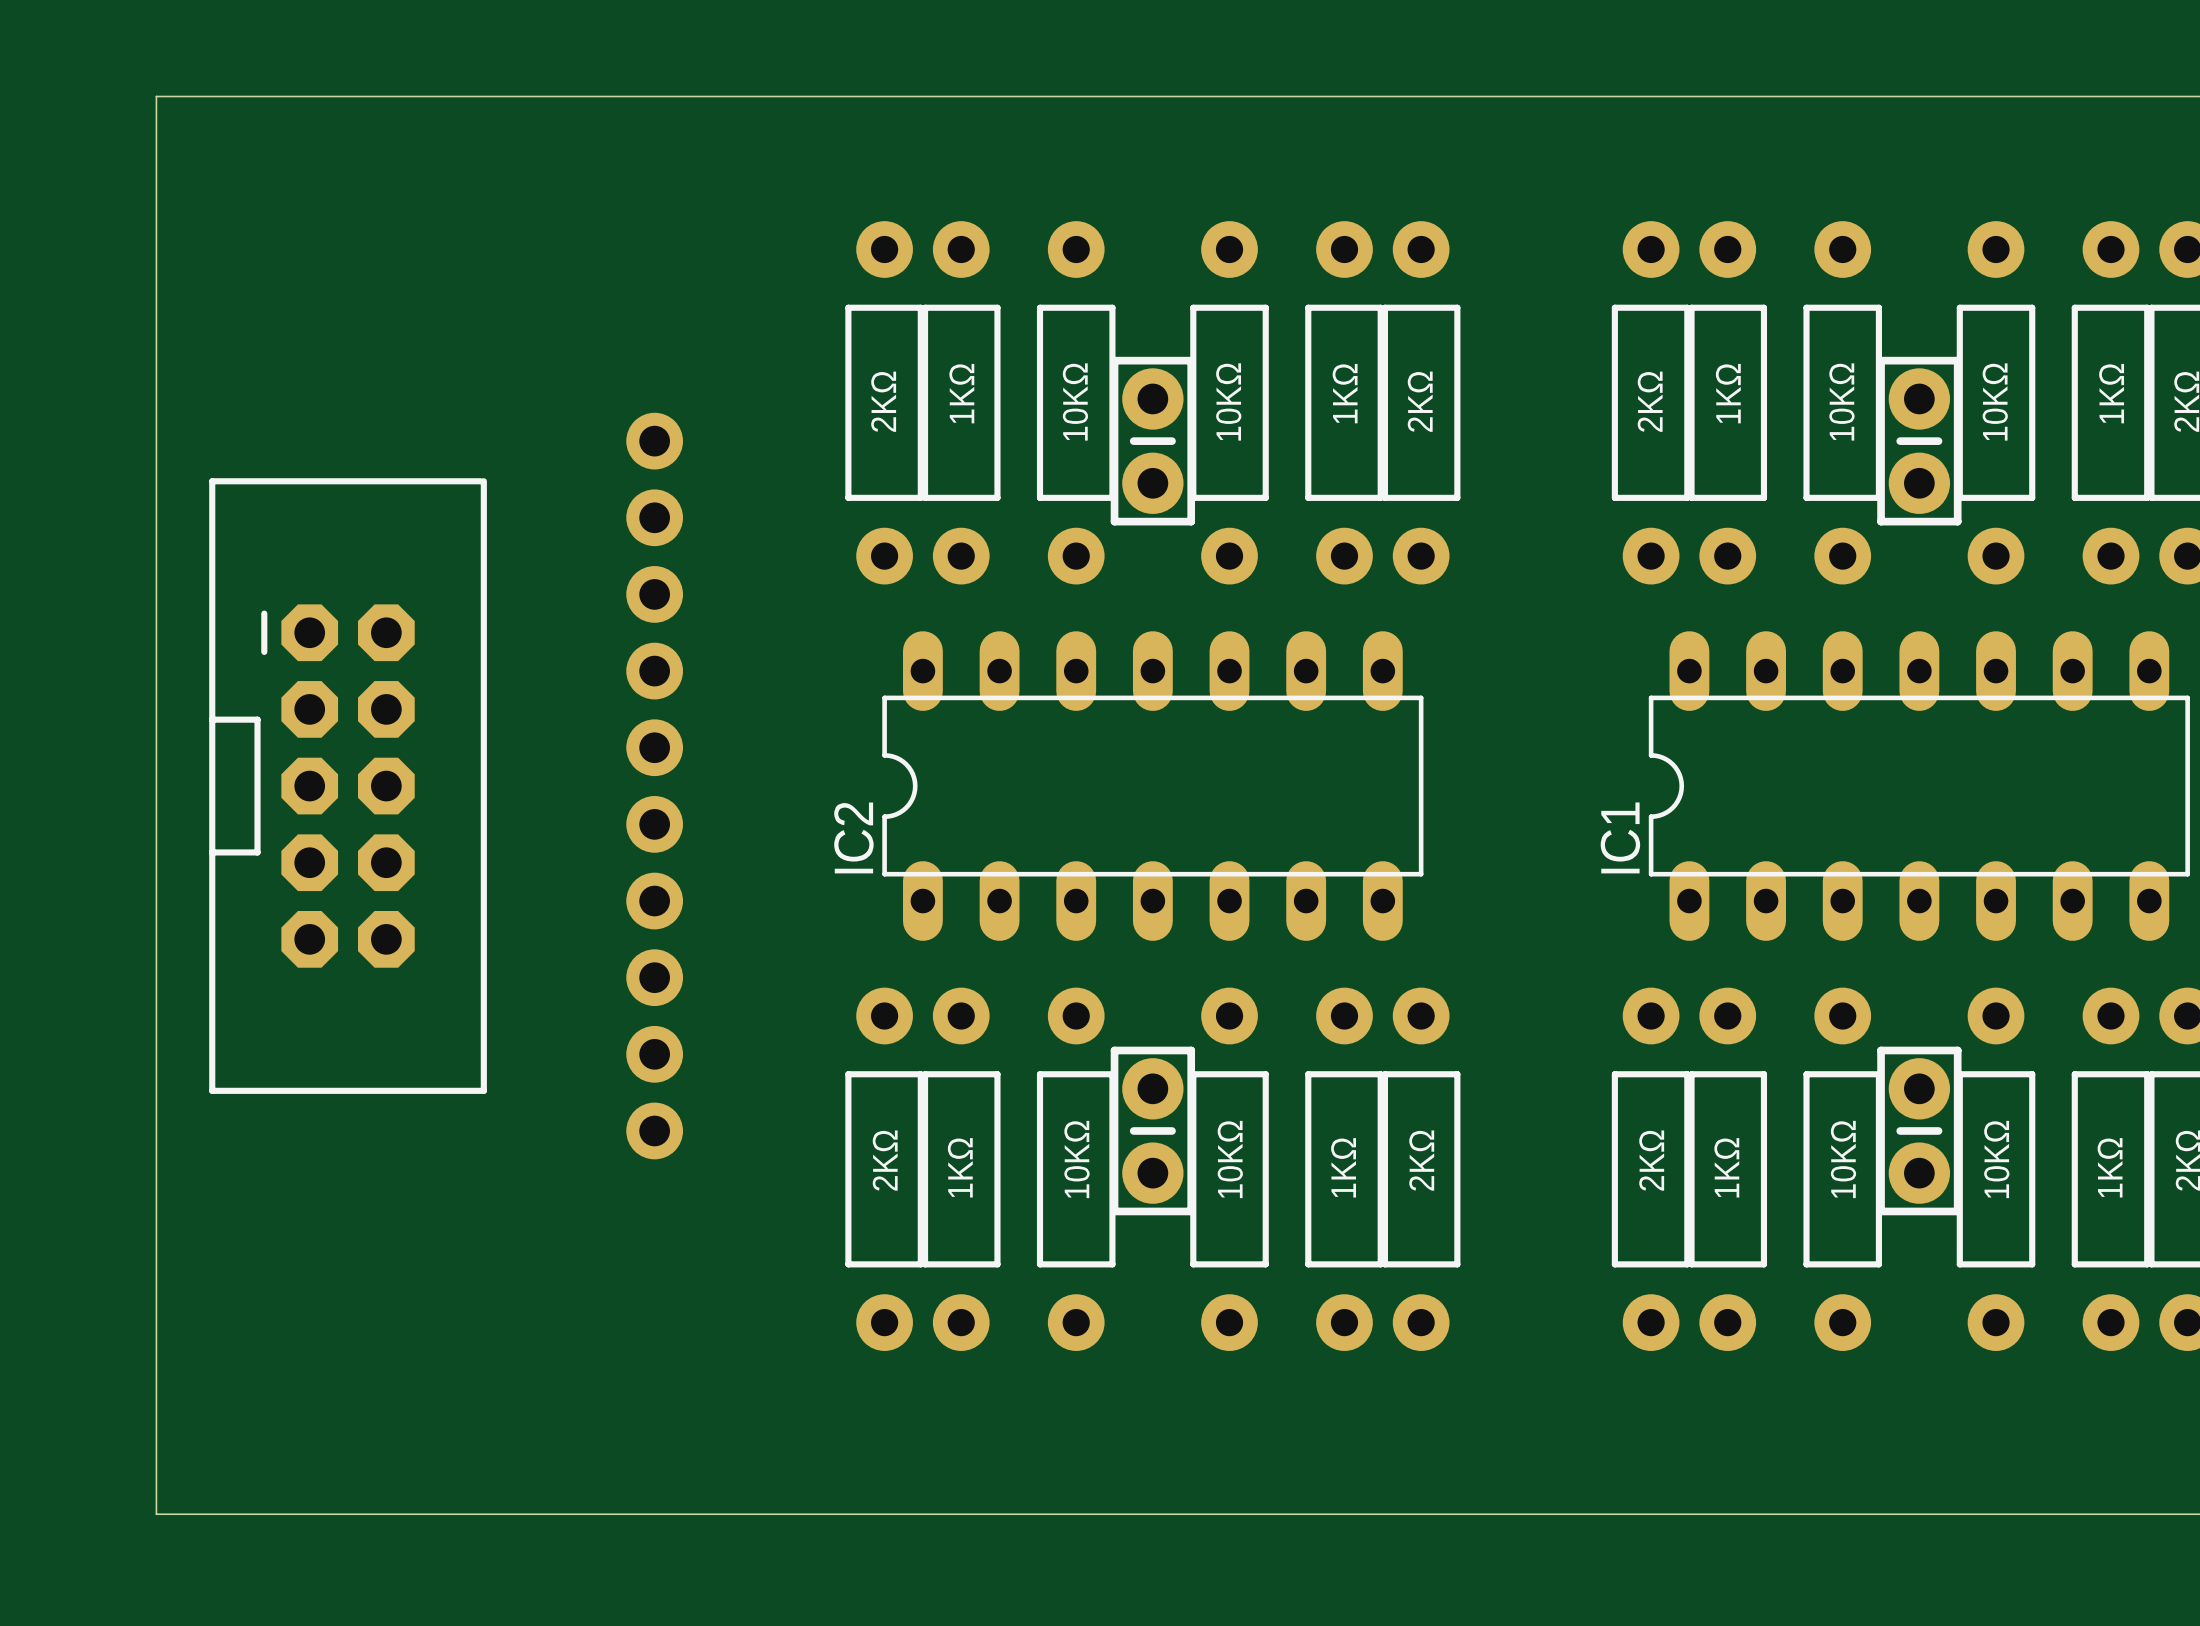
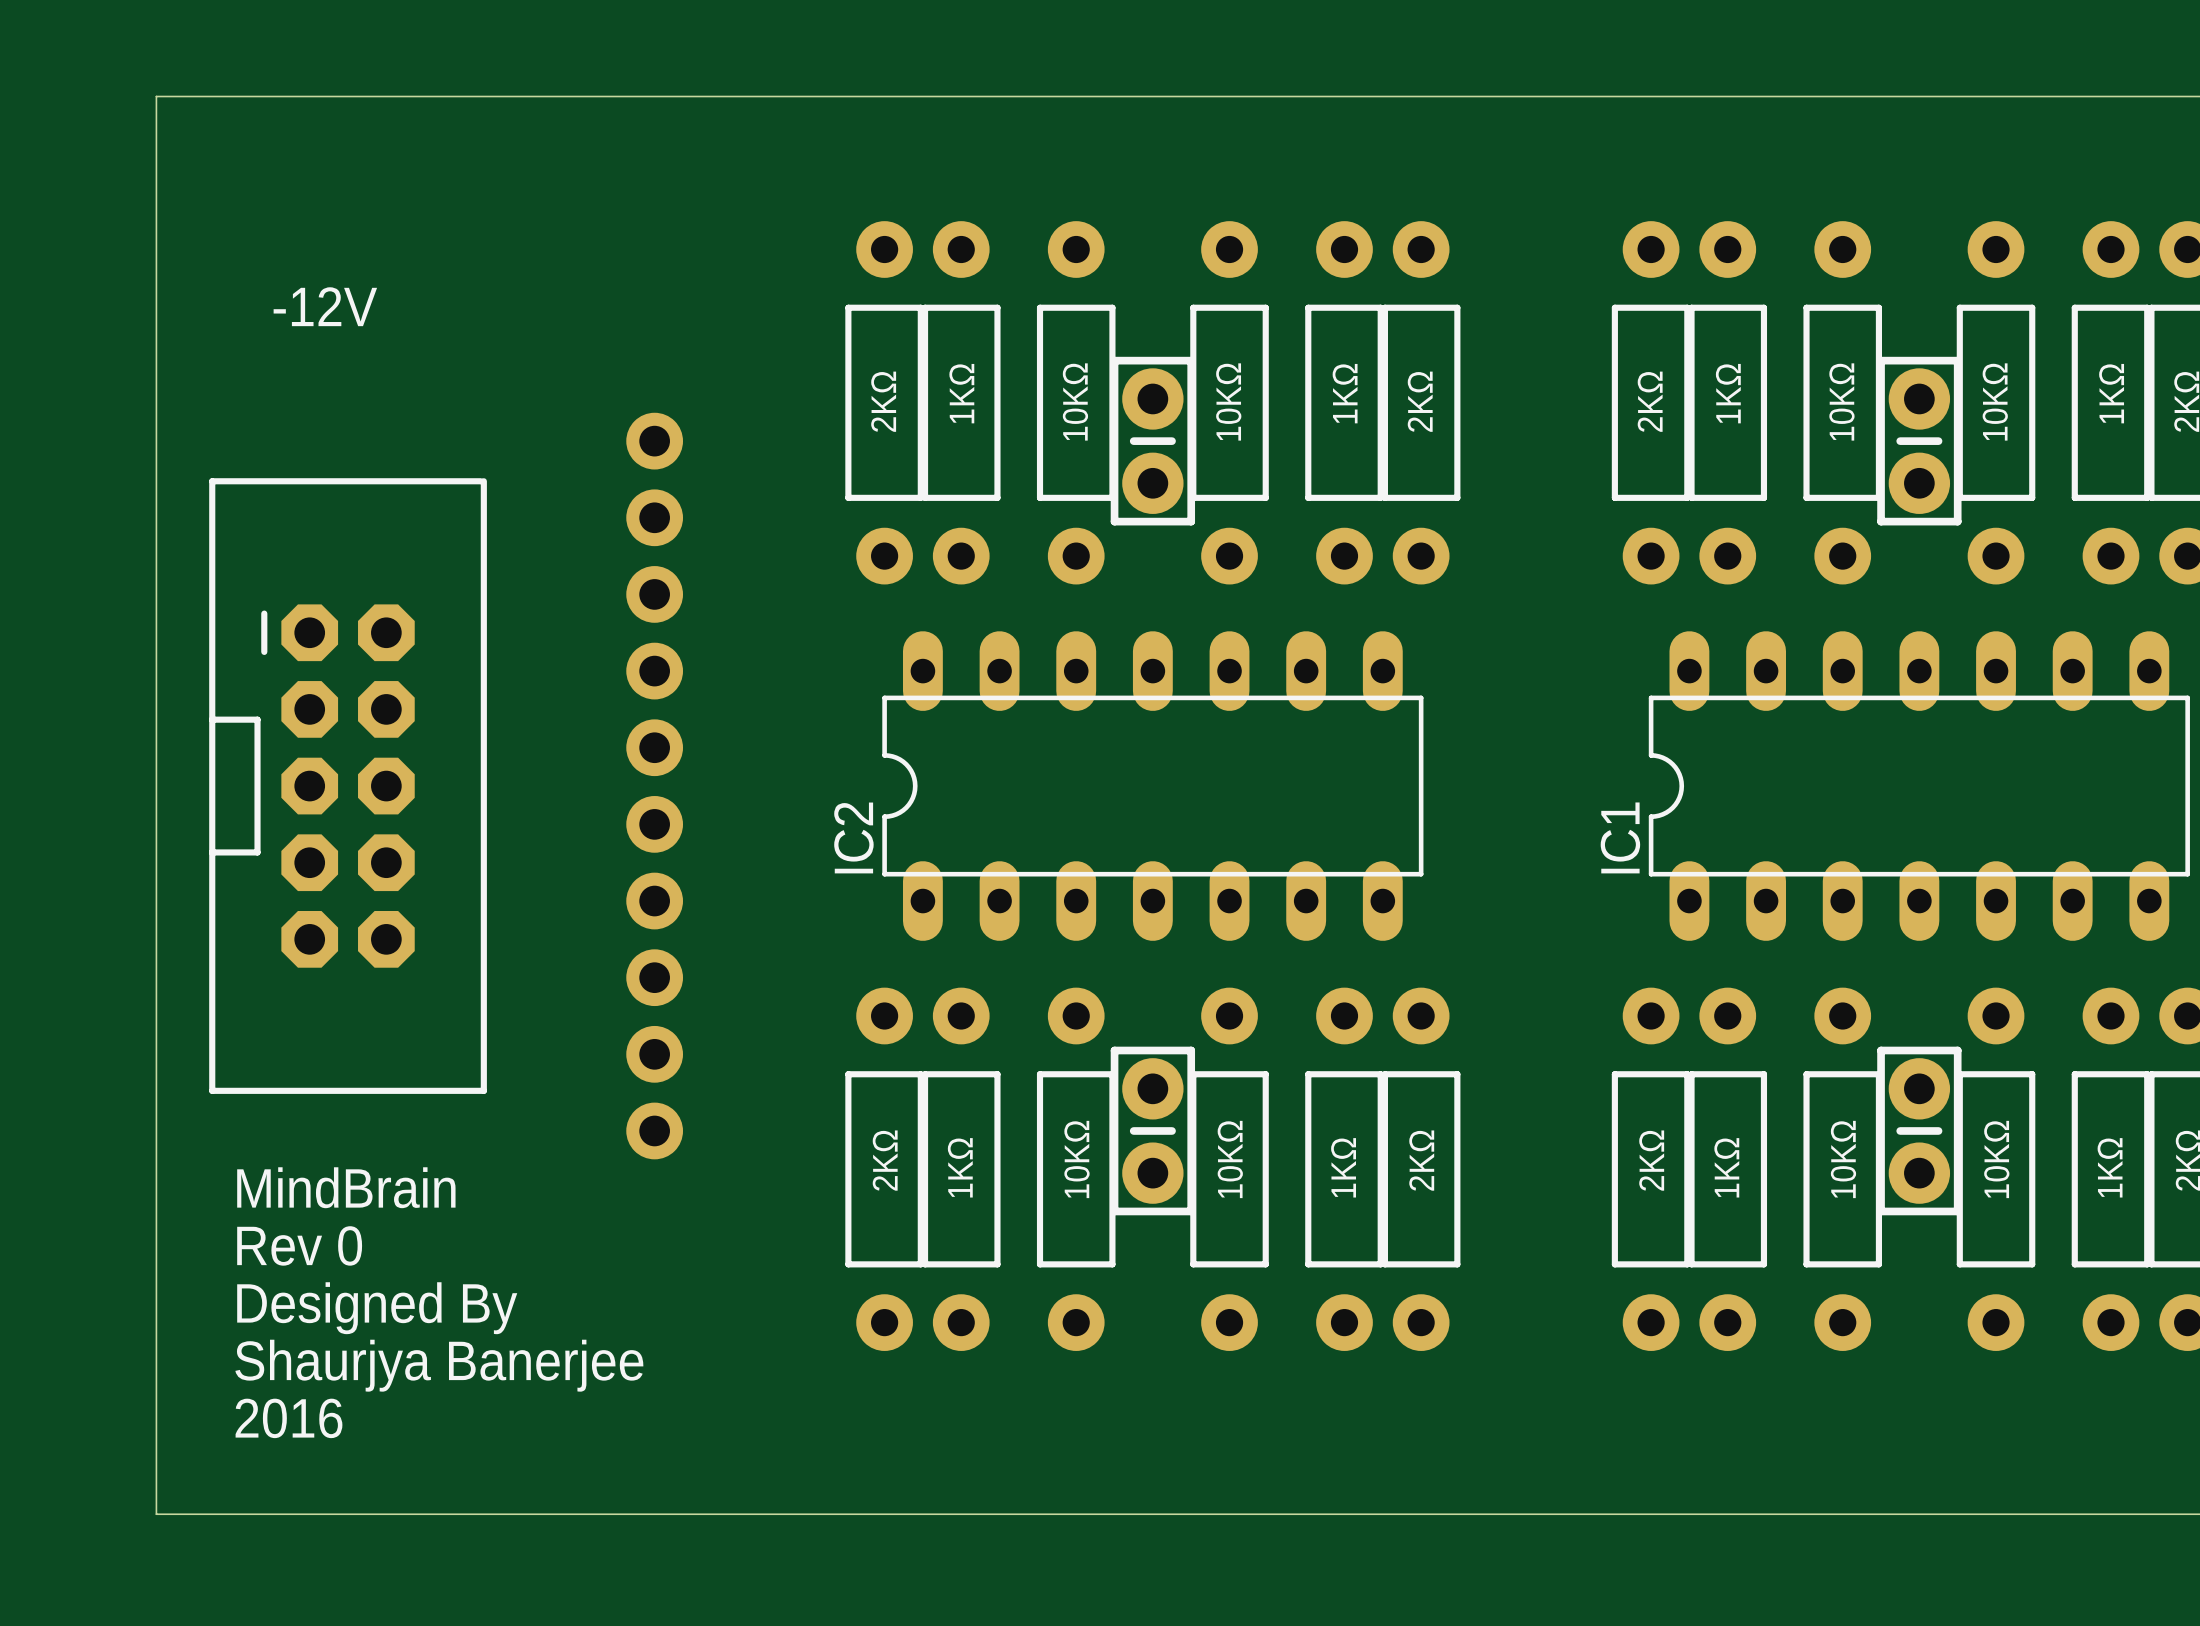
text: none -> -12V (325, 306)
text: none -> MindBrain (346, 1187)
text: none -> Rev 0 (299, 1245)
text: none -> Designed By (377, 1308)
text: none -> Shaurjya Banerjee (439, 1365)
text: none -> 2016 (288, 1418)

